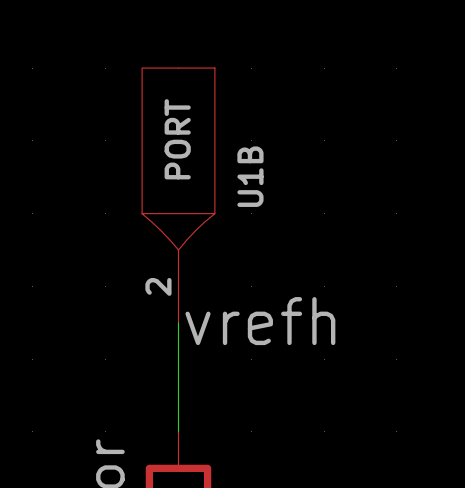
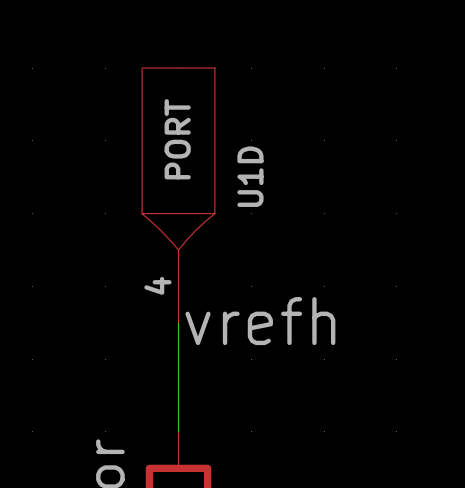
U1B name: U1B (250, 176) -> U1D (250, 176)
U1B pin number: 2 (158, 286) -> 4 (157, 285)

